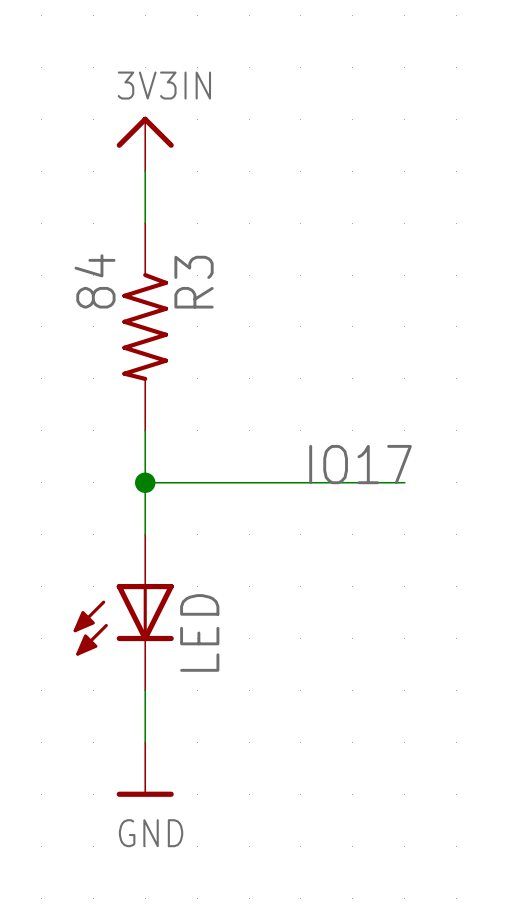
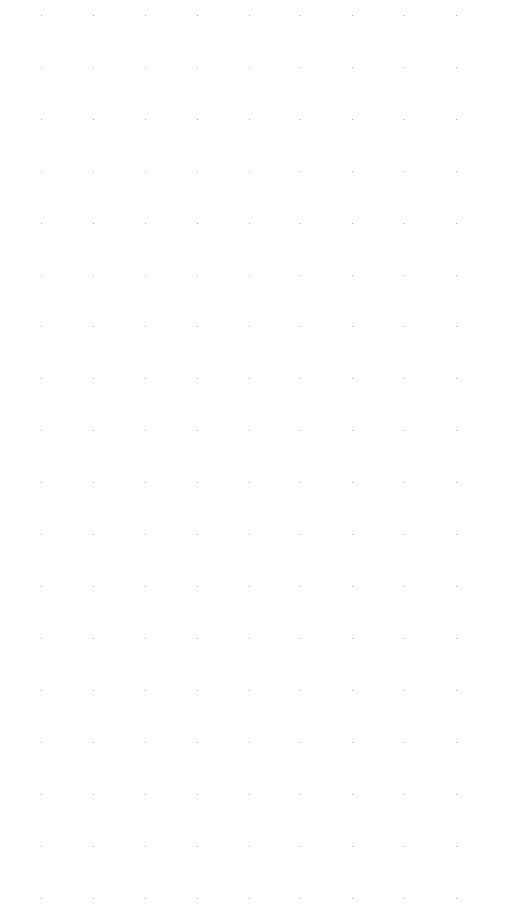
power symbol: 3V3IN (145, 143) -> none
wire: (145, 171) (145, 223) -> none
R3: 84 (145, 326) -> none
wire: (145, 430) (145, 534) -> none
label: IO17 (360, 464) -> none
wire: (145, 482) (404, 482) -> none
junction: (145, 482) -> none
LED: (123, 612) -> none
wire: (145, 690) (145, 742) -> none
power symbol: GND (145, 769) -> none

